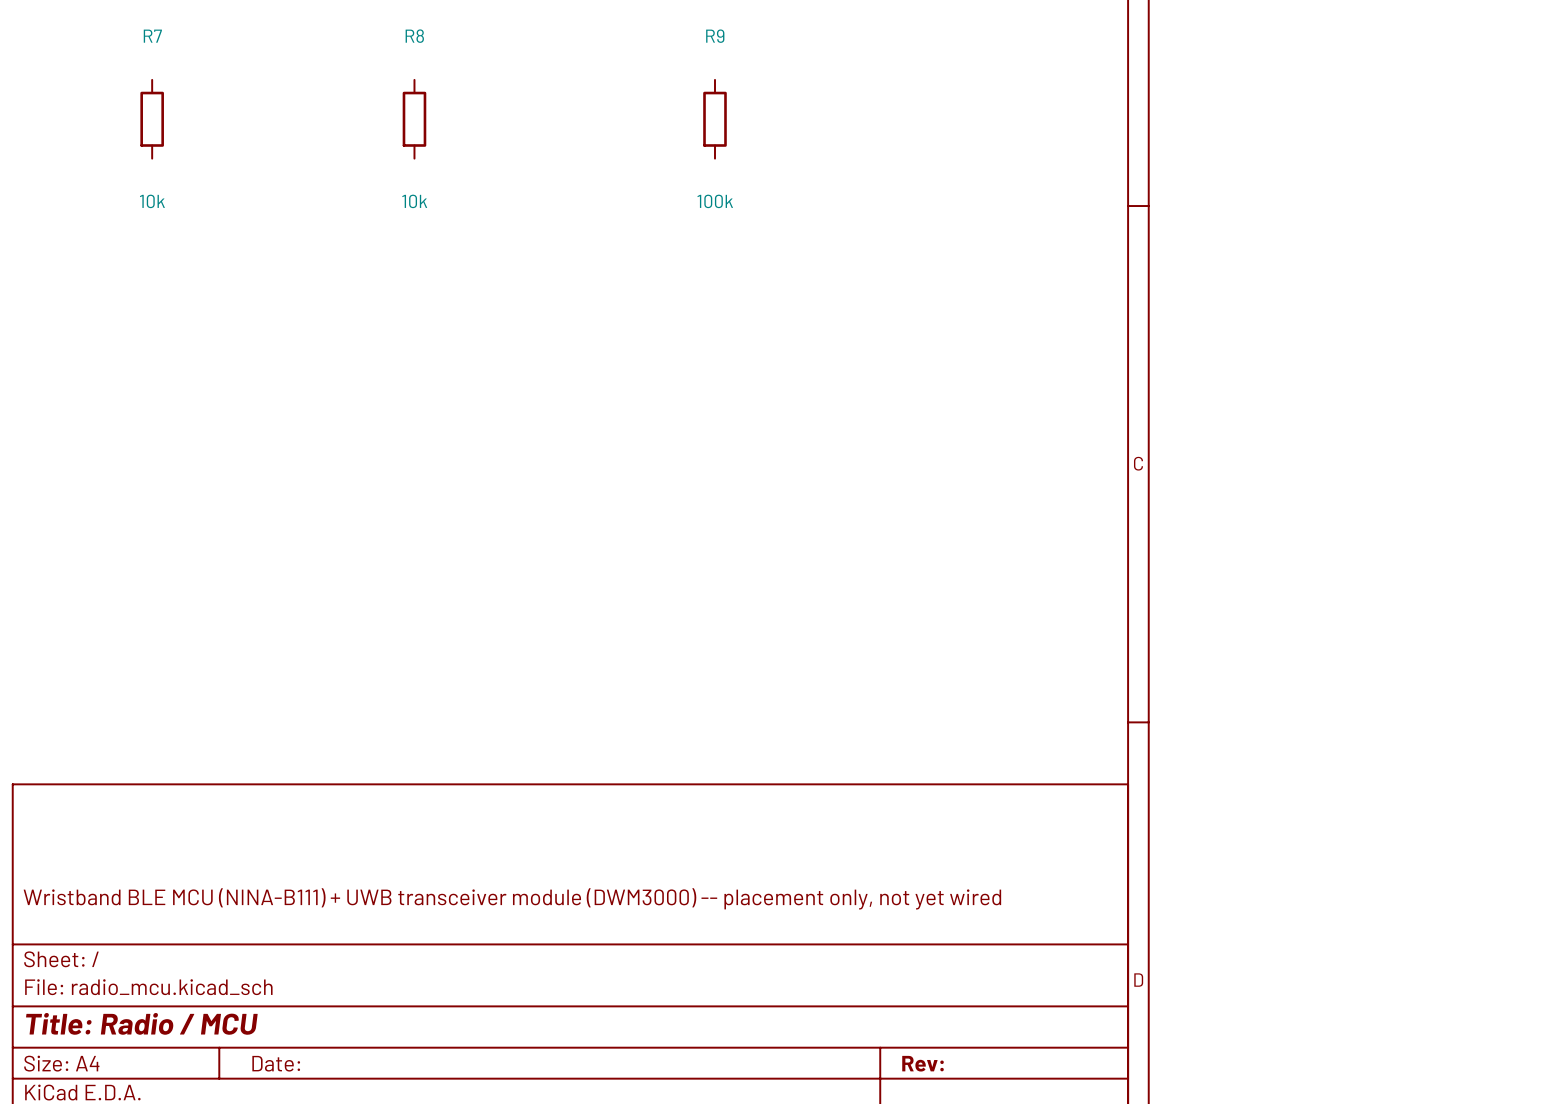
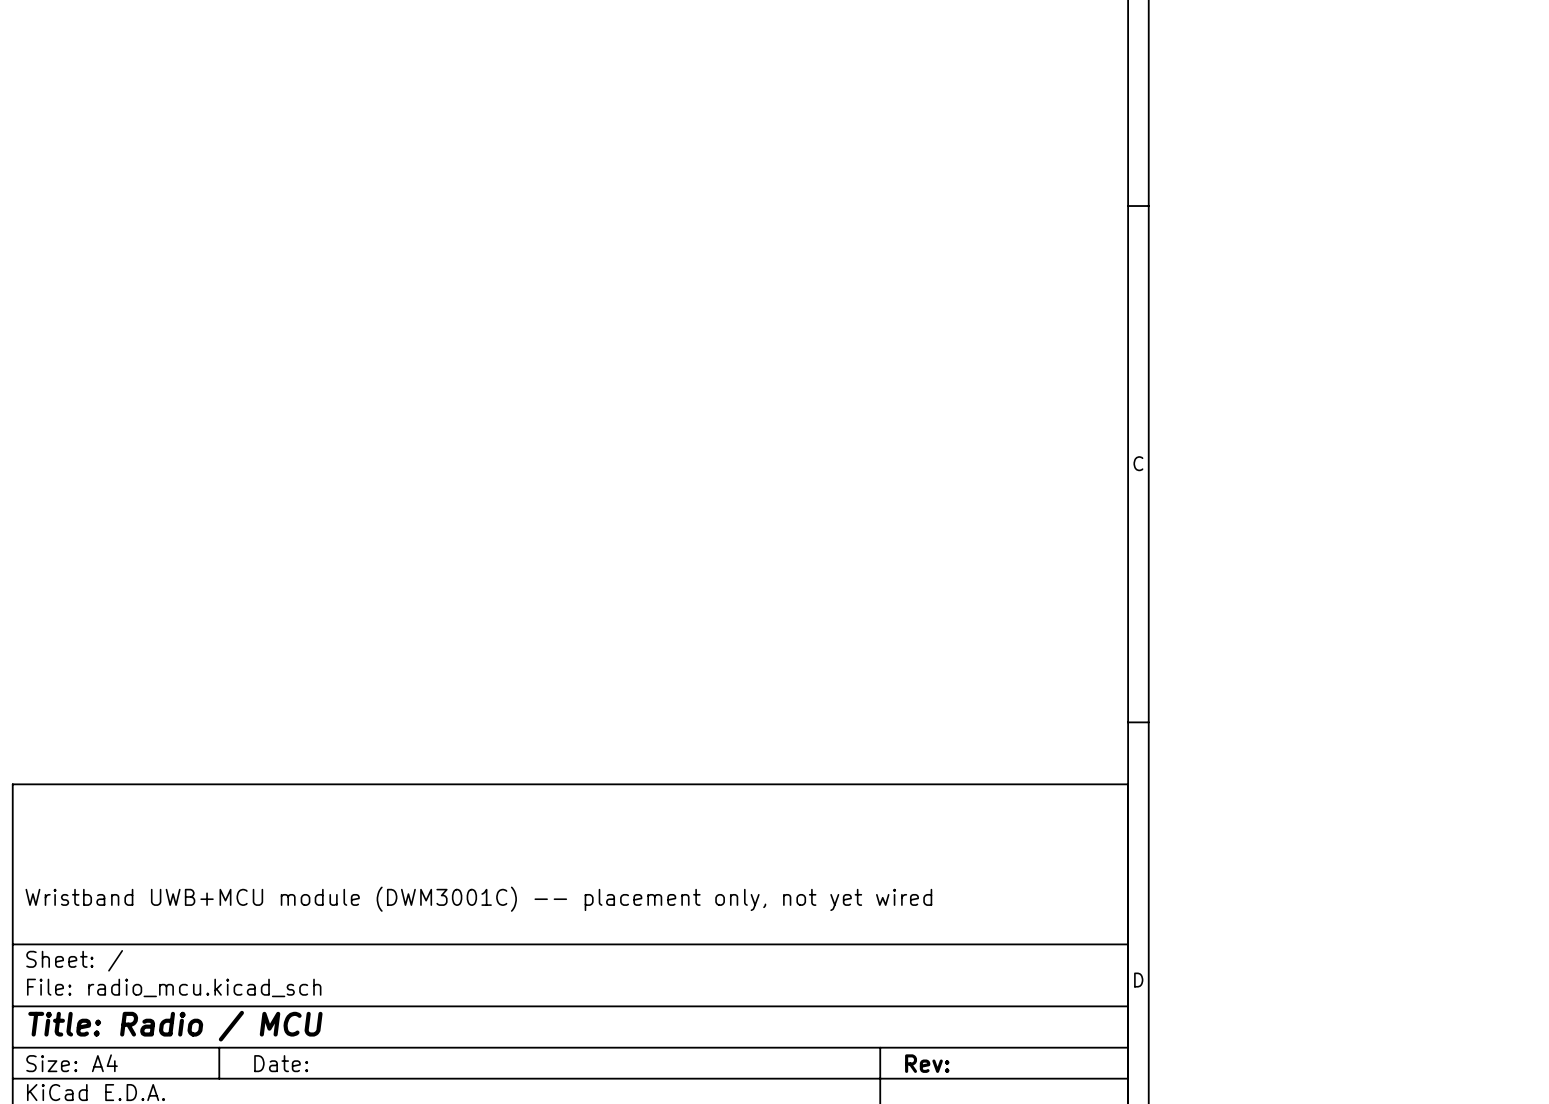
R7: 10k (152, 119) -> none
R8: 10k (414, 119) -> none
R9: 100k (715, 119) -> none
title block: Wristband BLE MCU (NINA-B111) + UWB transceiver module (DWM3000) -- placement only, not yet wired (512, 898) -> Wristband UWB+MCU module (DWM3001C) -- placement only, not yet wired (478, 899)

